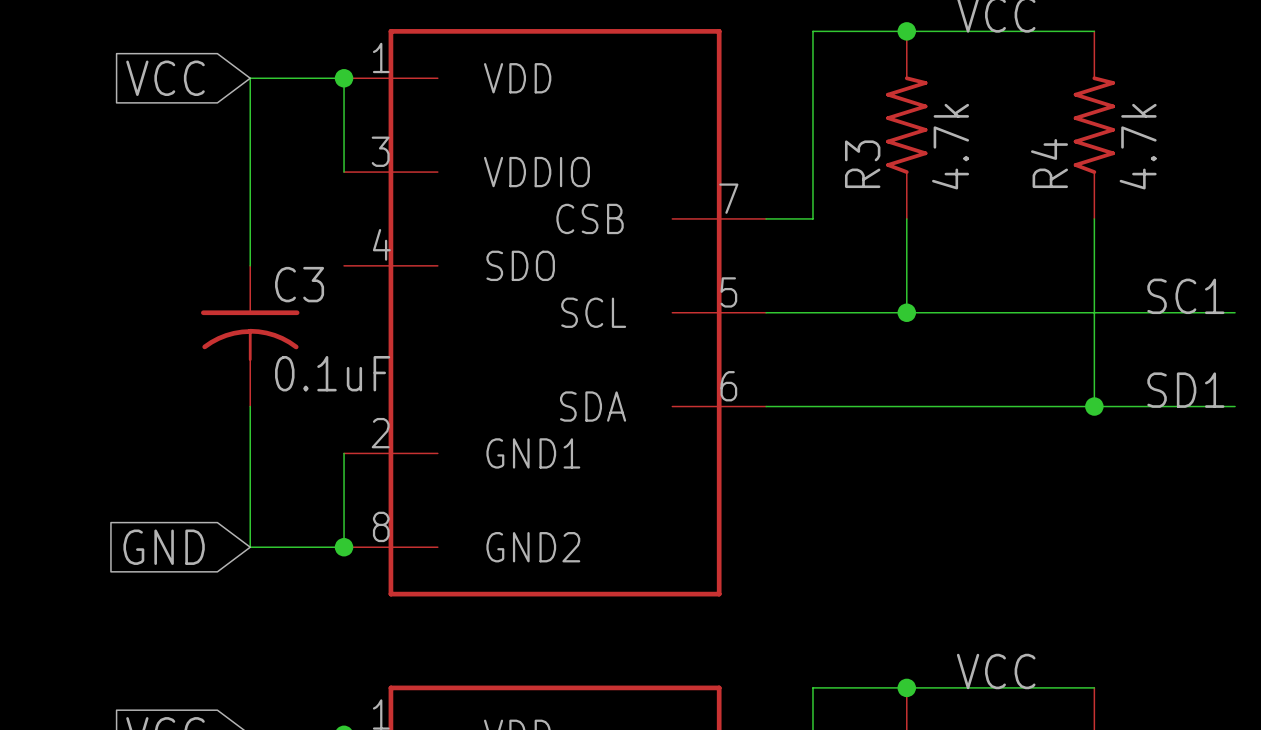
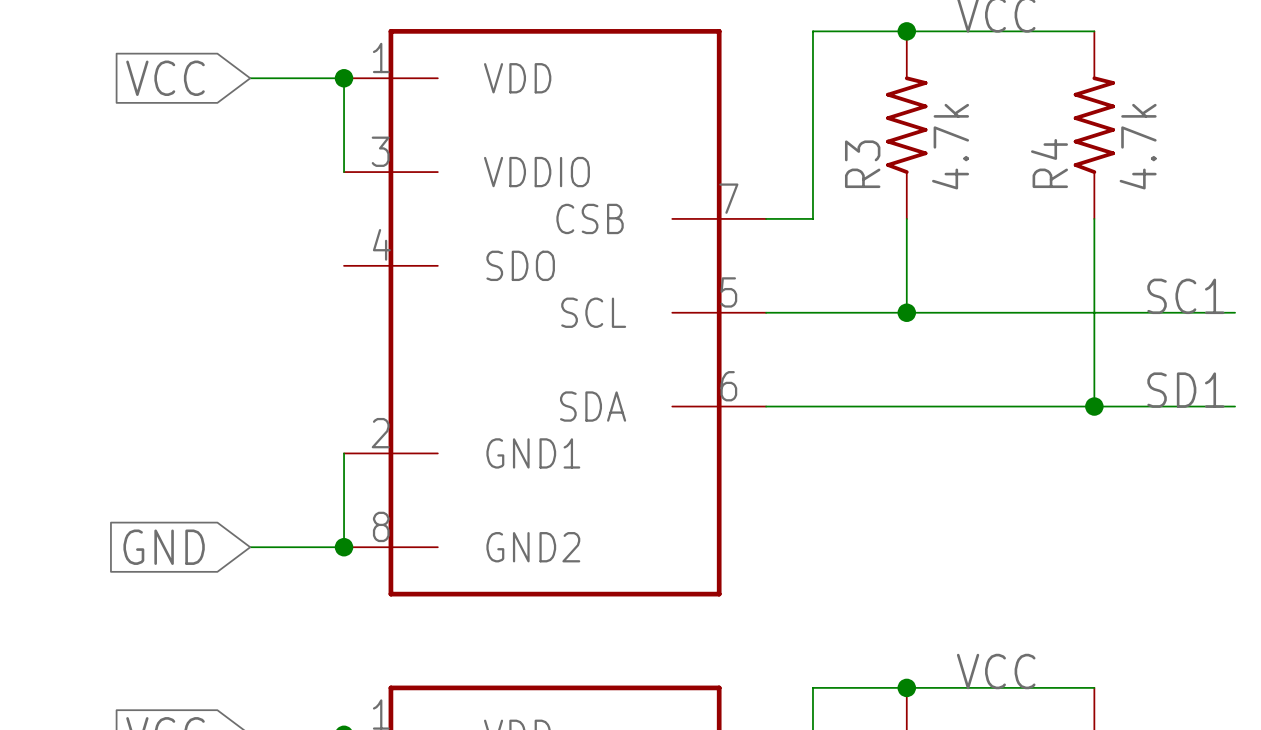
wire: (250, 78) (250, 265) -> none
C3: 0.1uF (250, 336) -> none
wire: (250, 406) (250, 547) -> none

